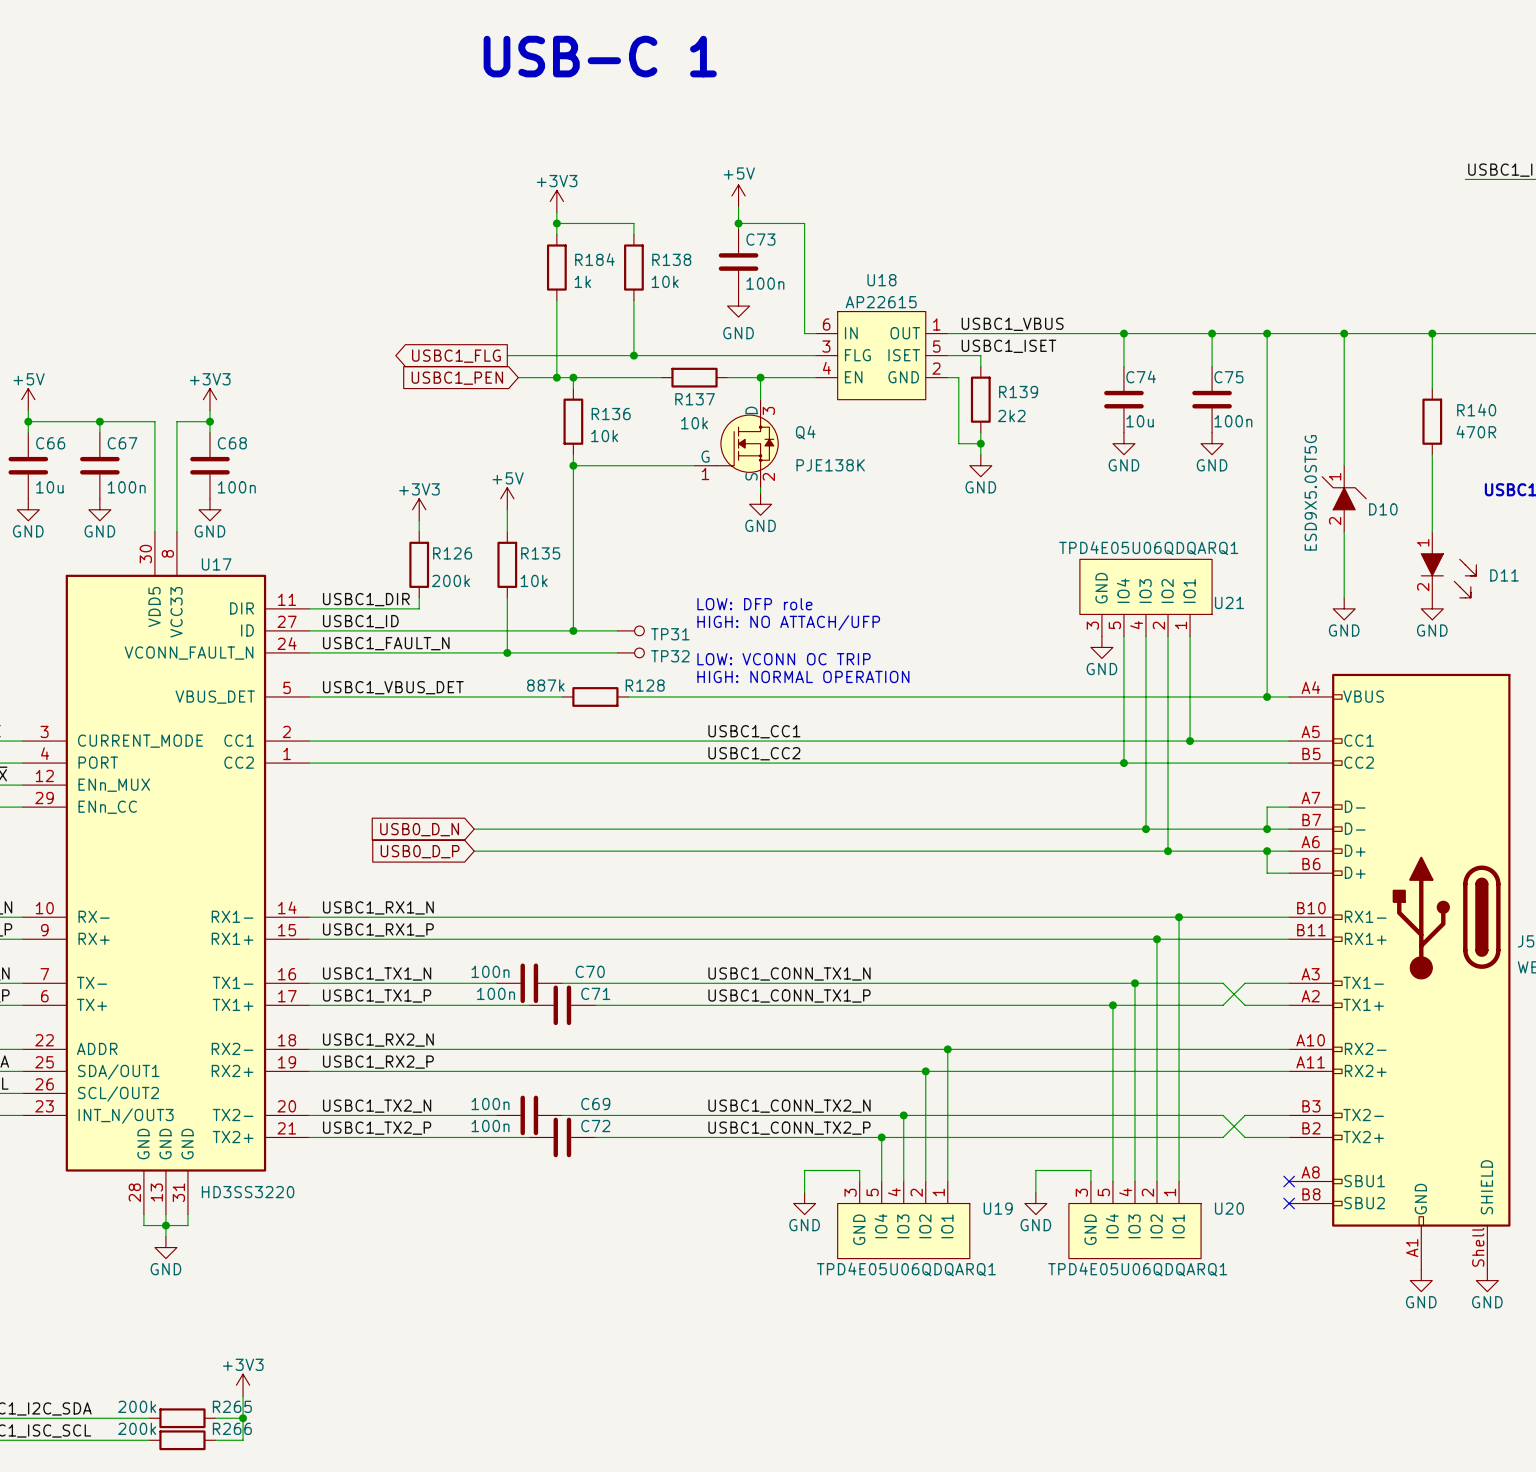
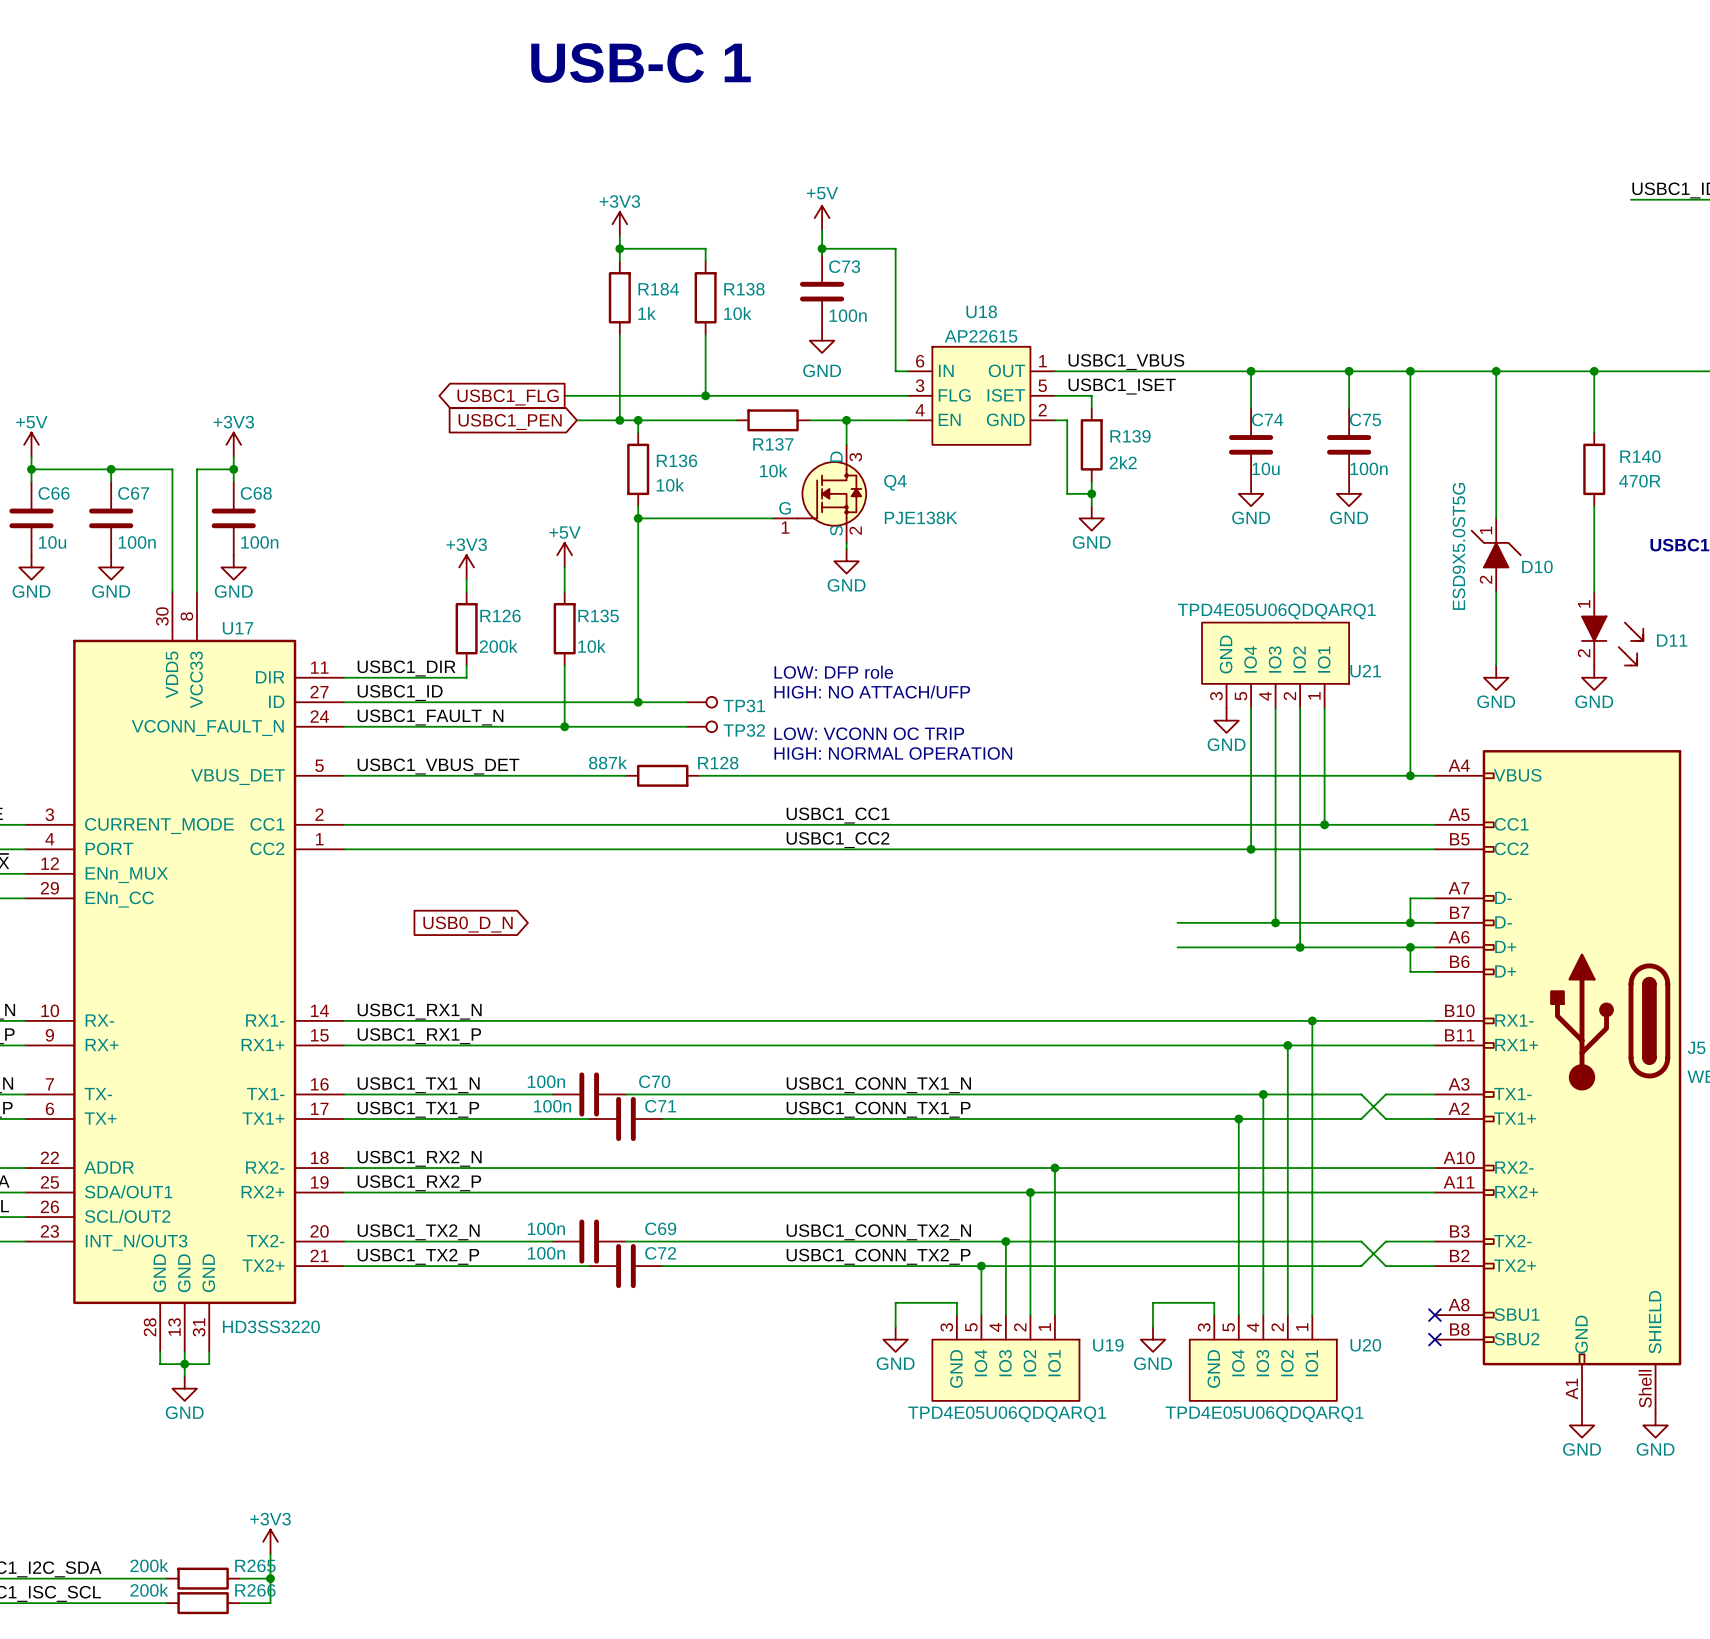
wire: (474, 829) (1057, 829) -> none
global label: USB0_D_P (420, 851) -> none
wire: (474, 851) (1057, 851) -> none

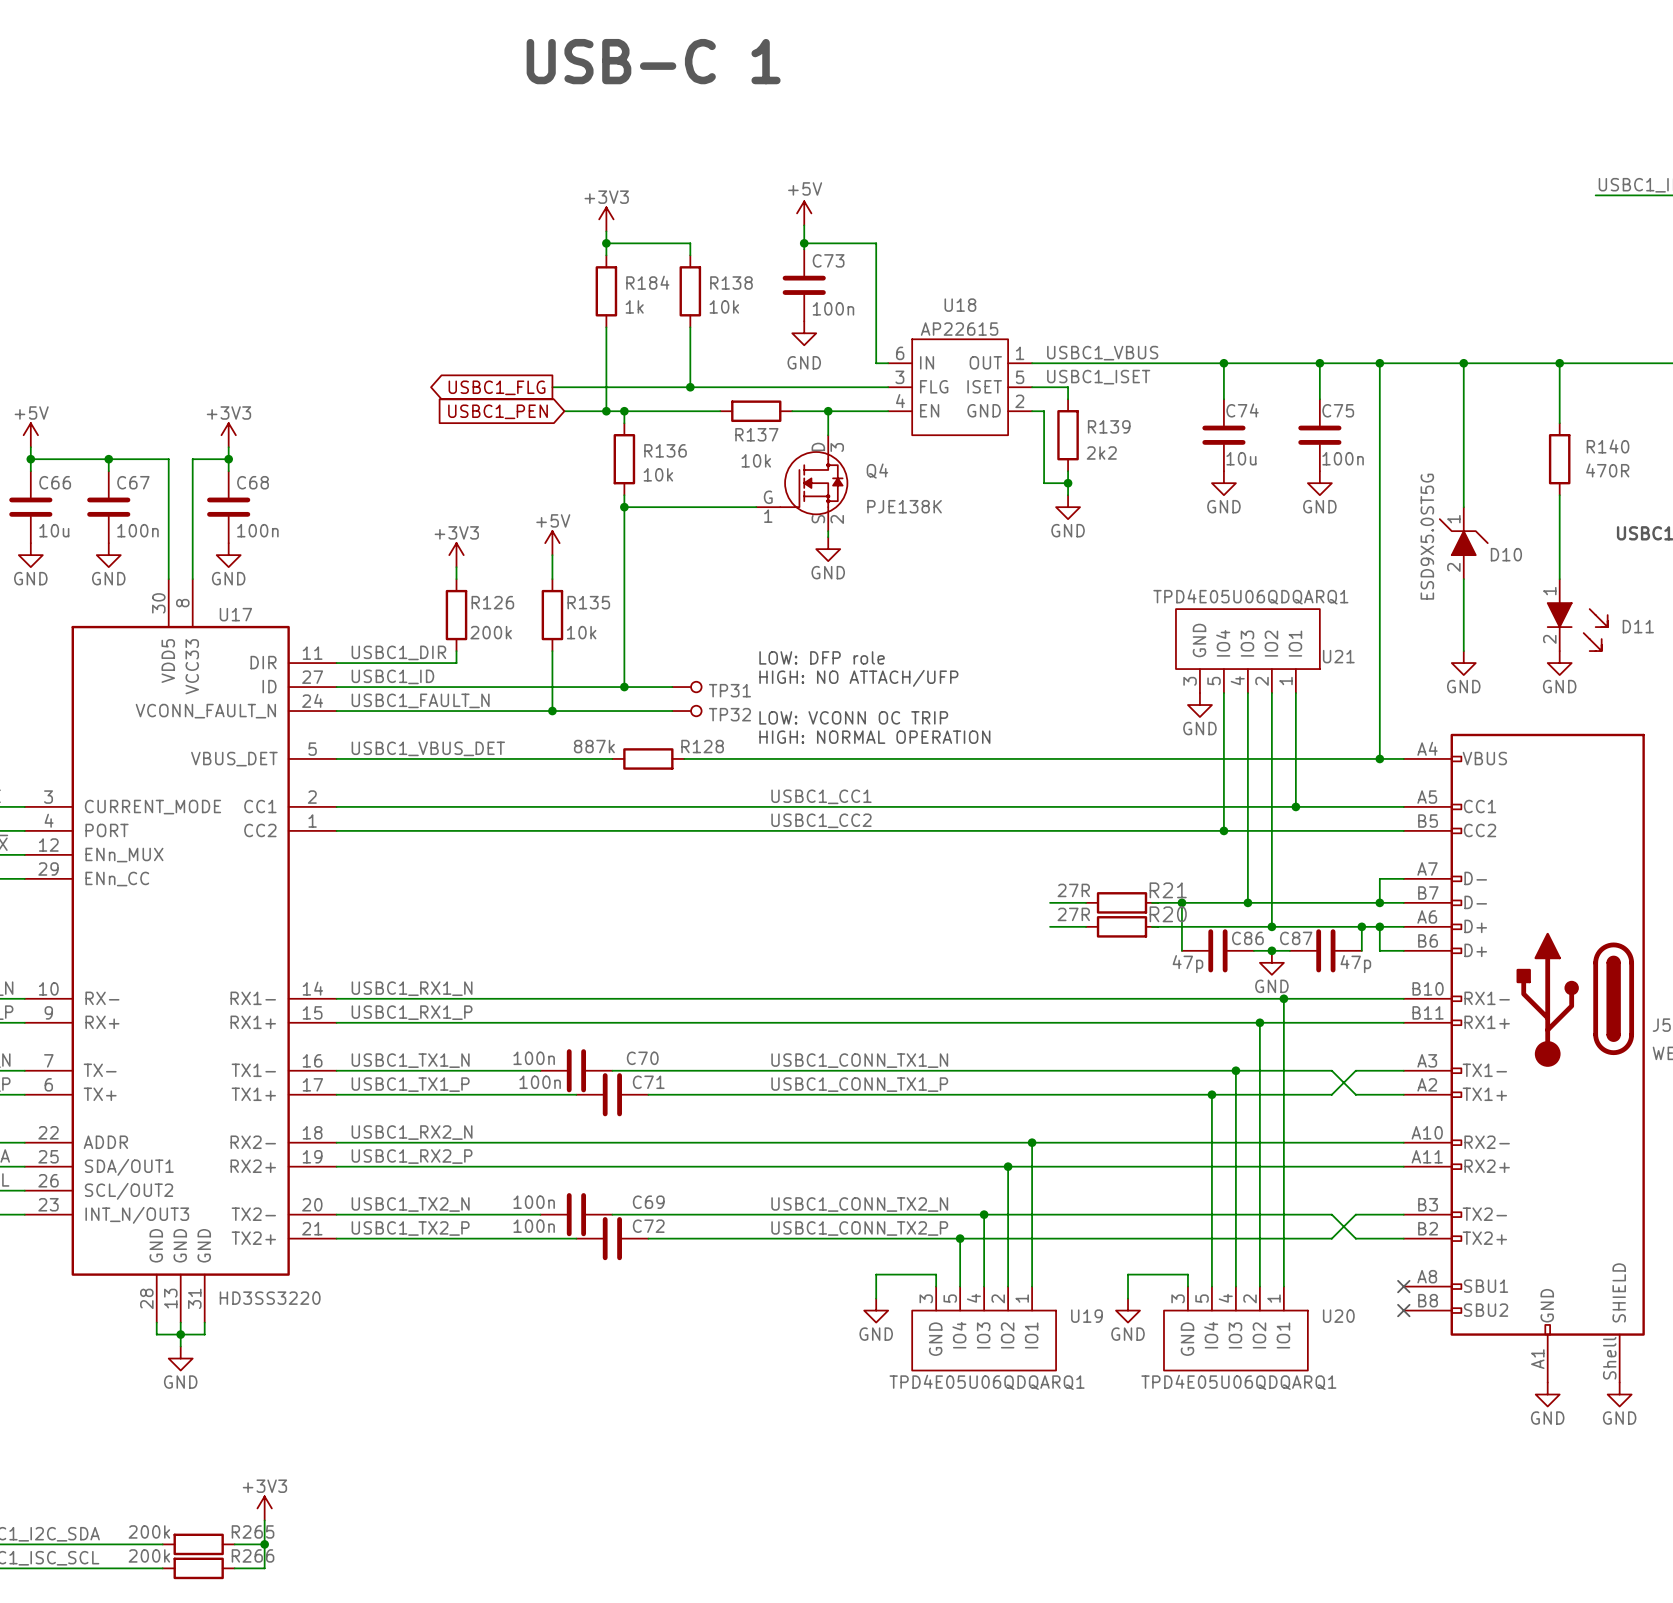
wire: none -> (1050, 902) (1086, 902)
R21: none -> (1122, 902)
wire: none -> (1181, 902) (1181, 950)
junction: none -> (1181, 902)
global label: USB0_D_N (468, 924) -> none
wire: none -> (1050, 926) (1086, 926)
R20: none -> (1122, 926)
wire: none -> (1361, 926) (1361, 950)
junction: none -> (1361, 926)
C86: none -> 47p (1217, 950)
wire: none -> (1253, 950) (1289, 950)
junction: none -> (1271, 950)
C87: none -> 47p (1325, 950)
power symbol: none -> GND (1271, 962)

